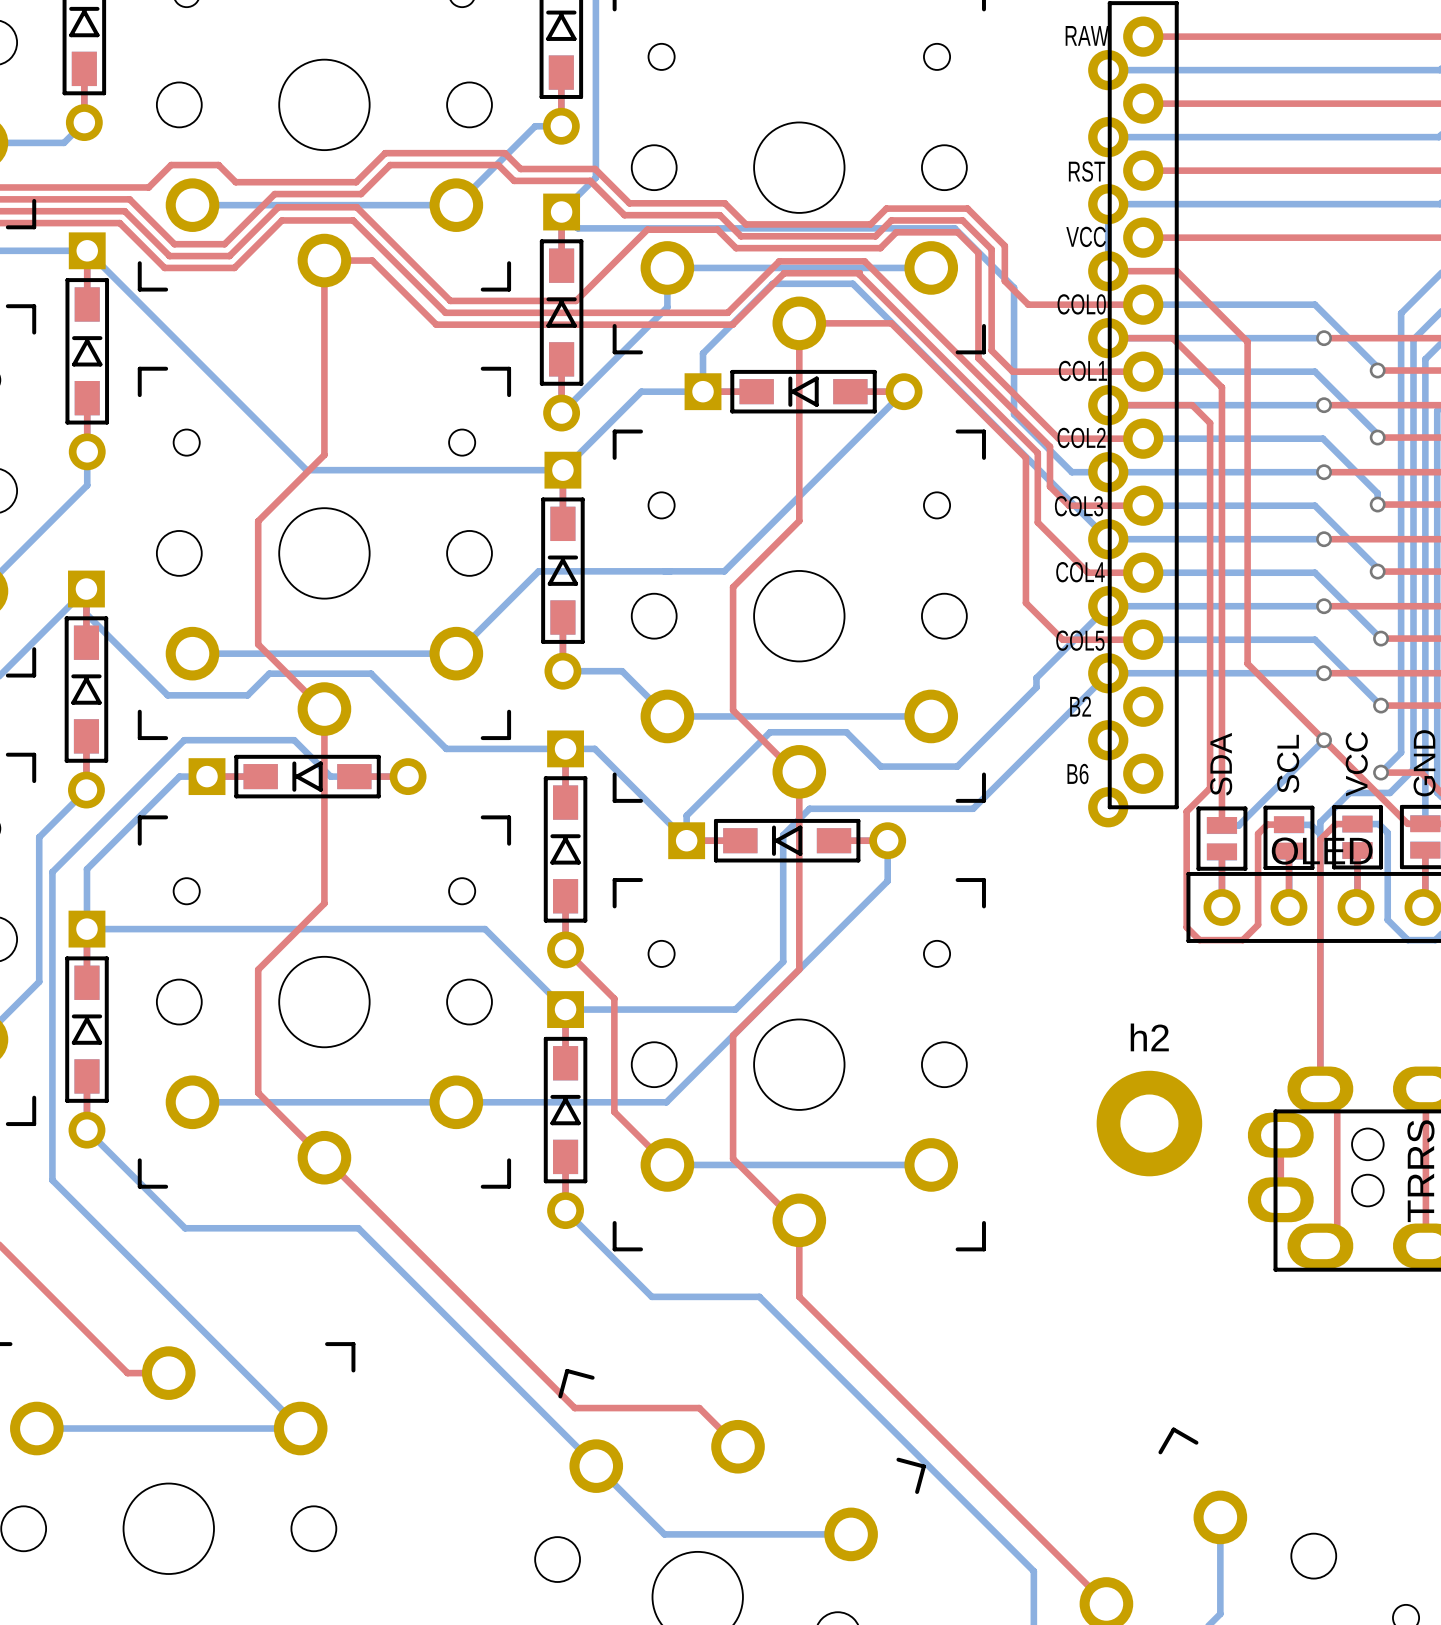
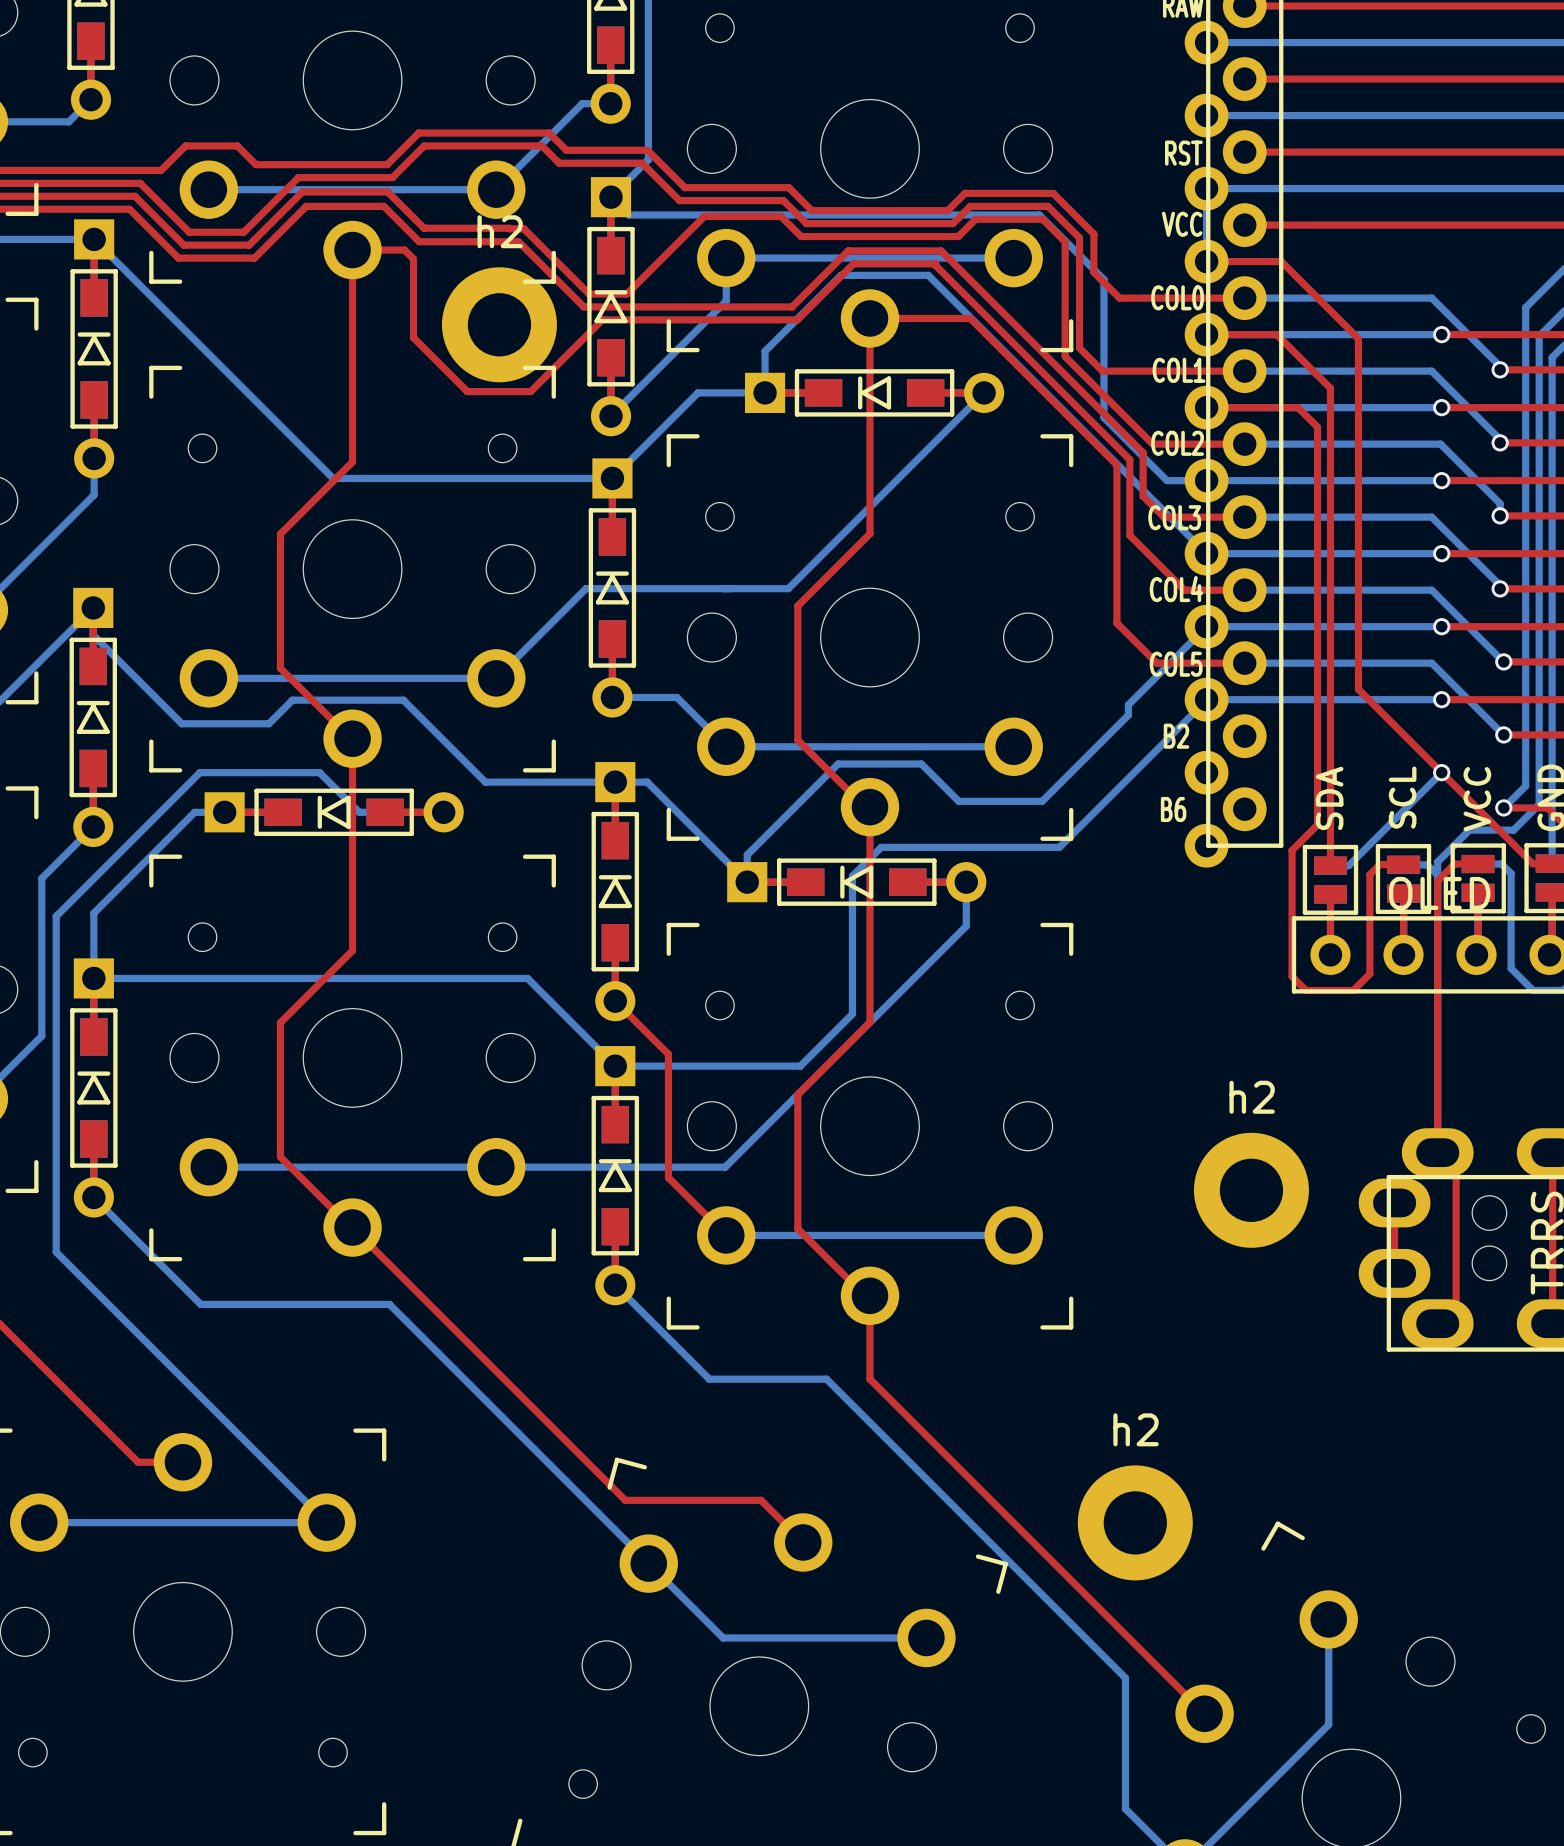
top track: (390, 240) (450, 300) (541, 300) -> (424, 228) (523, 228) (589, 294)
top track: (385, 252) (445, 312) (536, 312) -> (419, 241) (518, 241) (583, 306)
top track: (380, 268) (436, 324) (553, 324) -> (413, 258) (413, 337) (467, 391) (530, 391) (602, 319)
h2: none -> (499, 324)
h2: none -> (1135, 1522)

